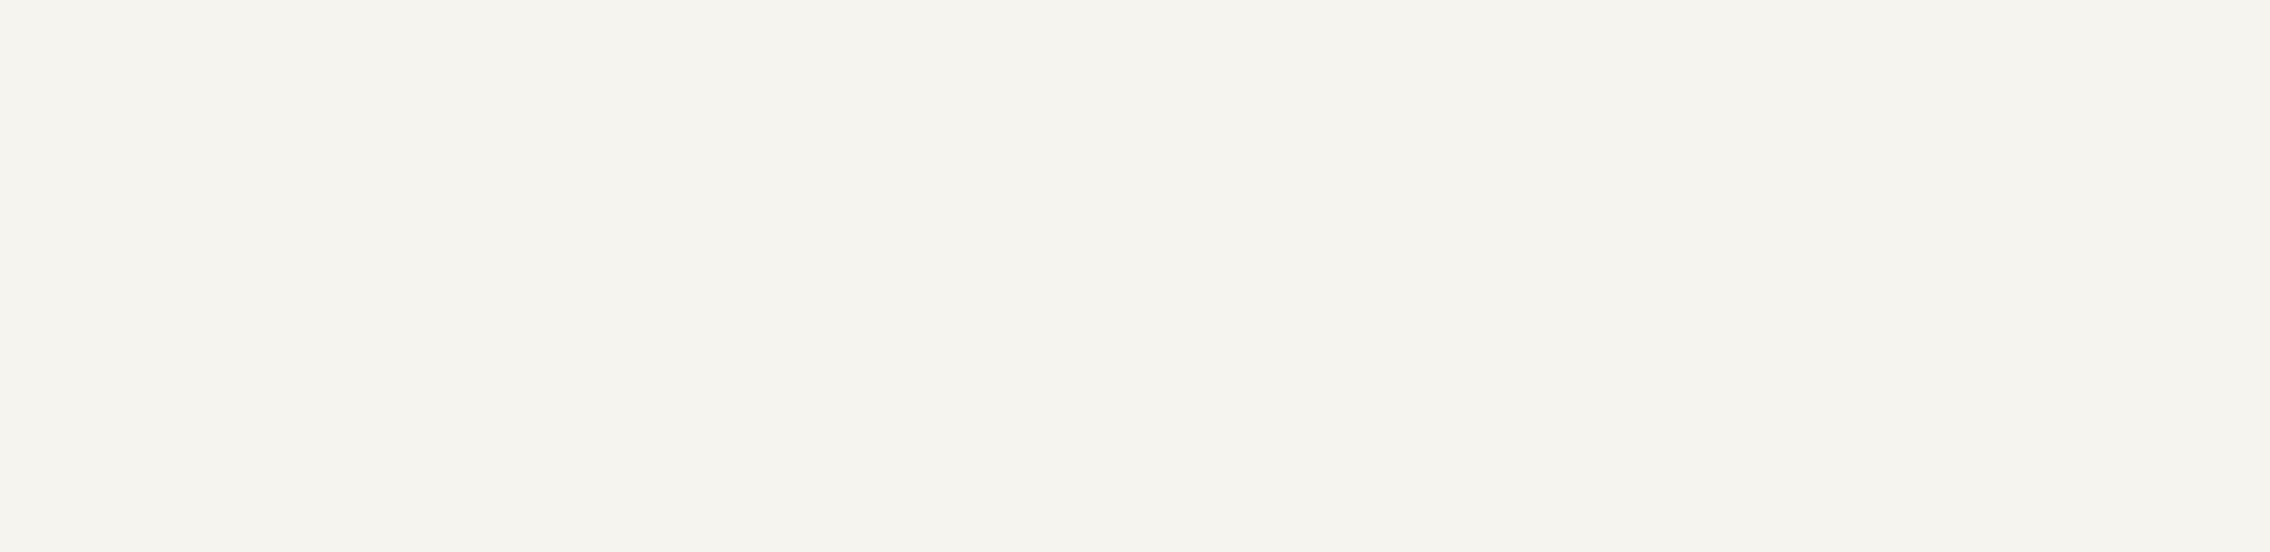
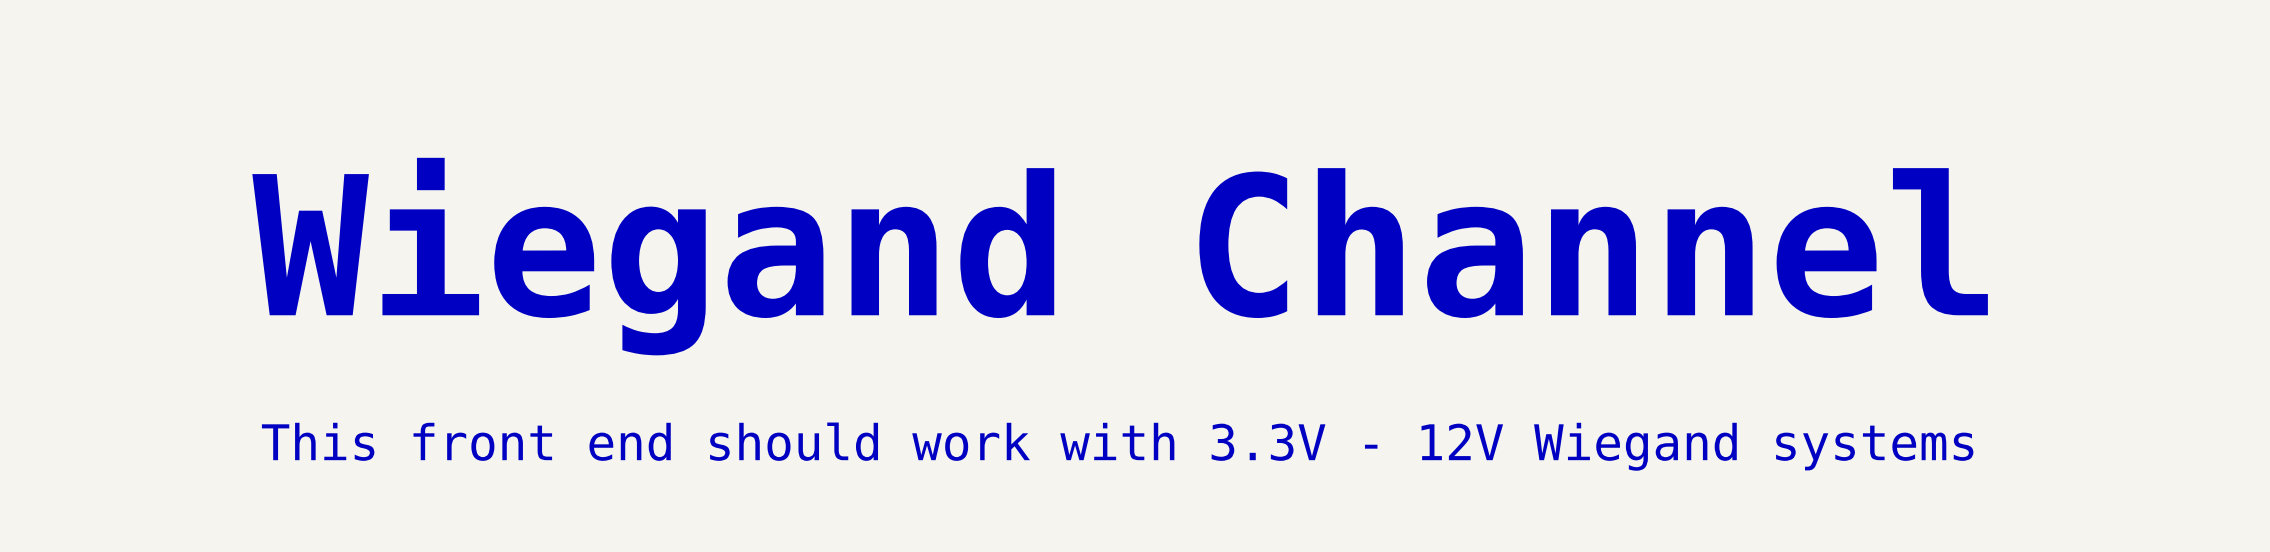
text: none -> Wiegand Channel (1120, 256)
text: none -> This front end should work with 3.3V - 12V Wiegand systems (1117, 446)

